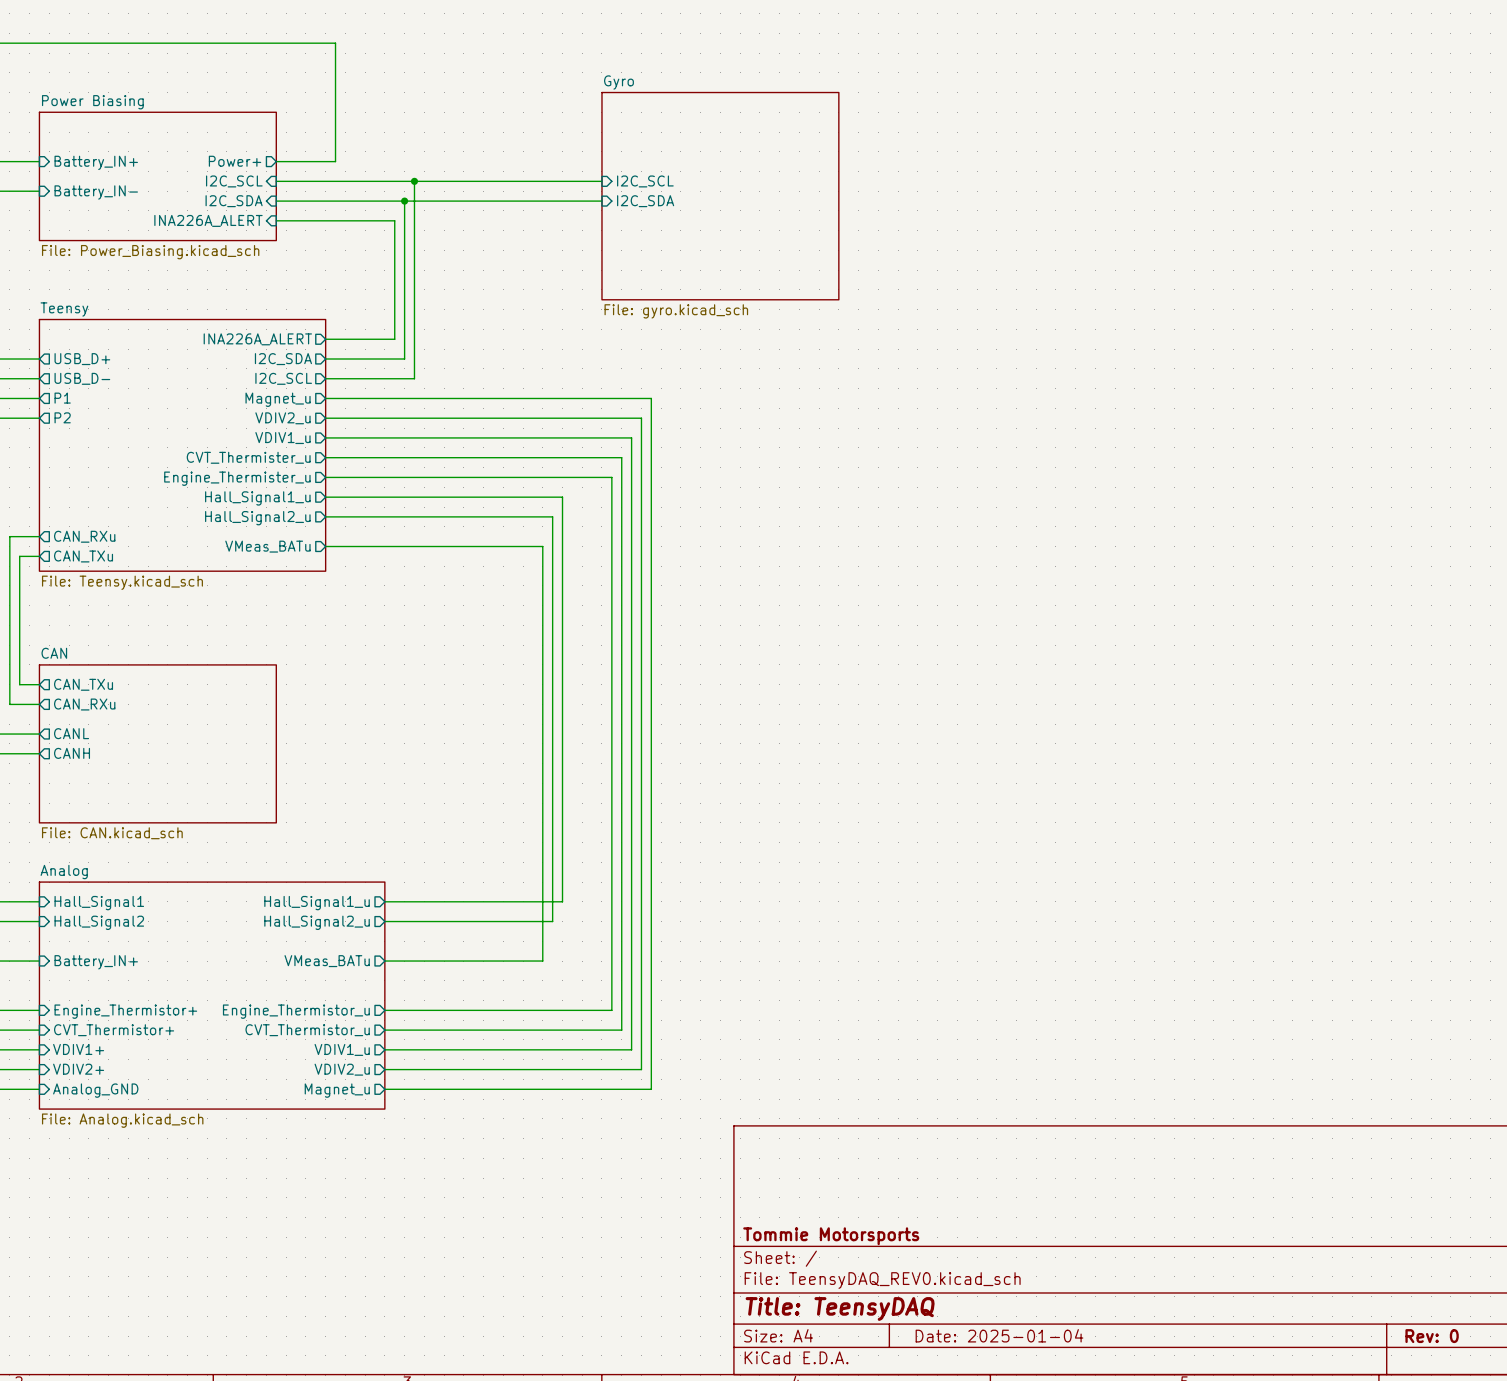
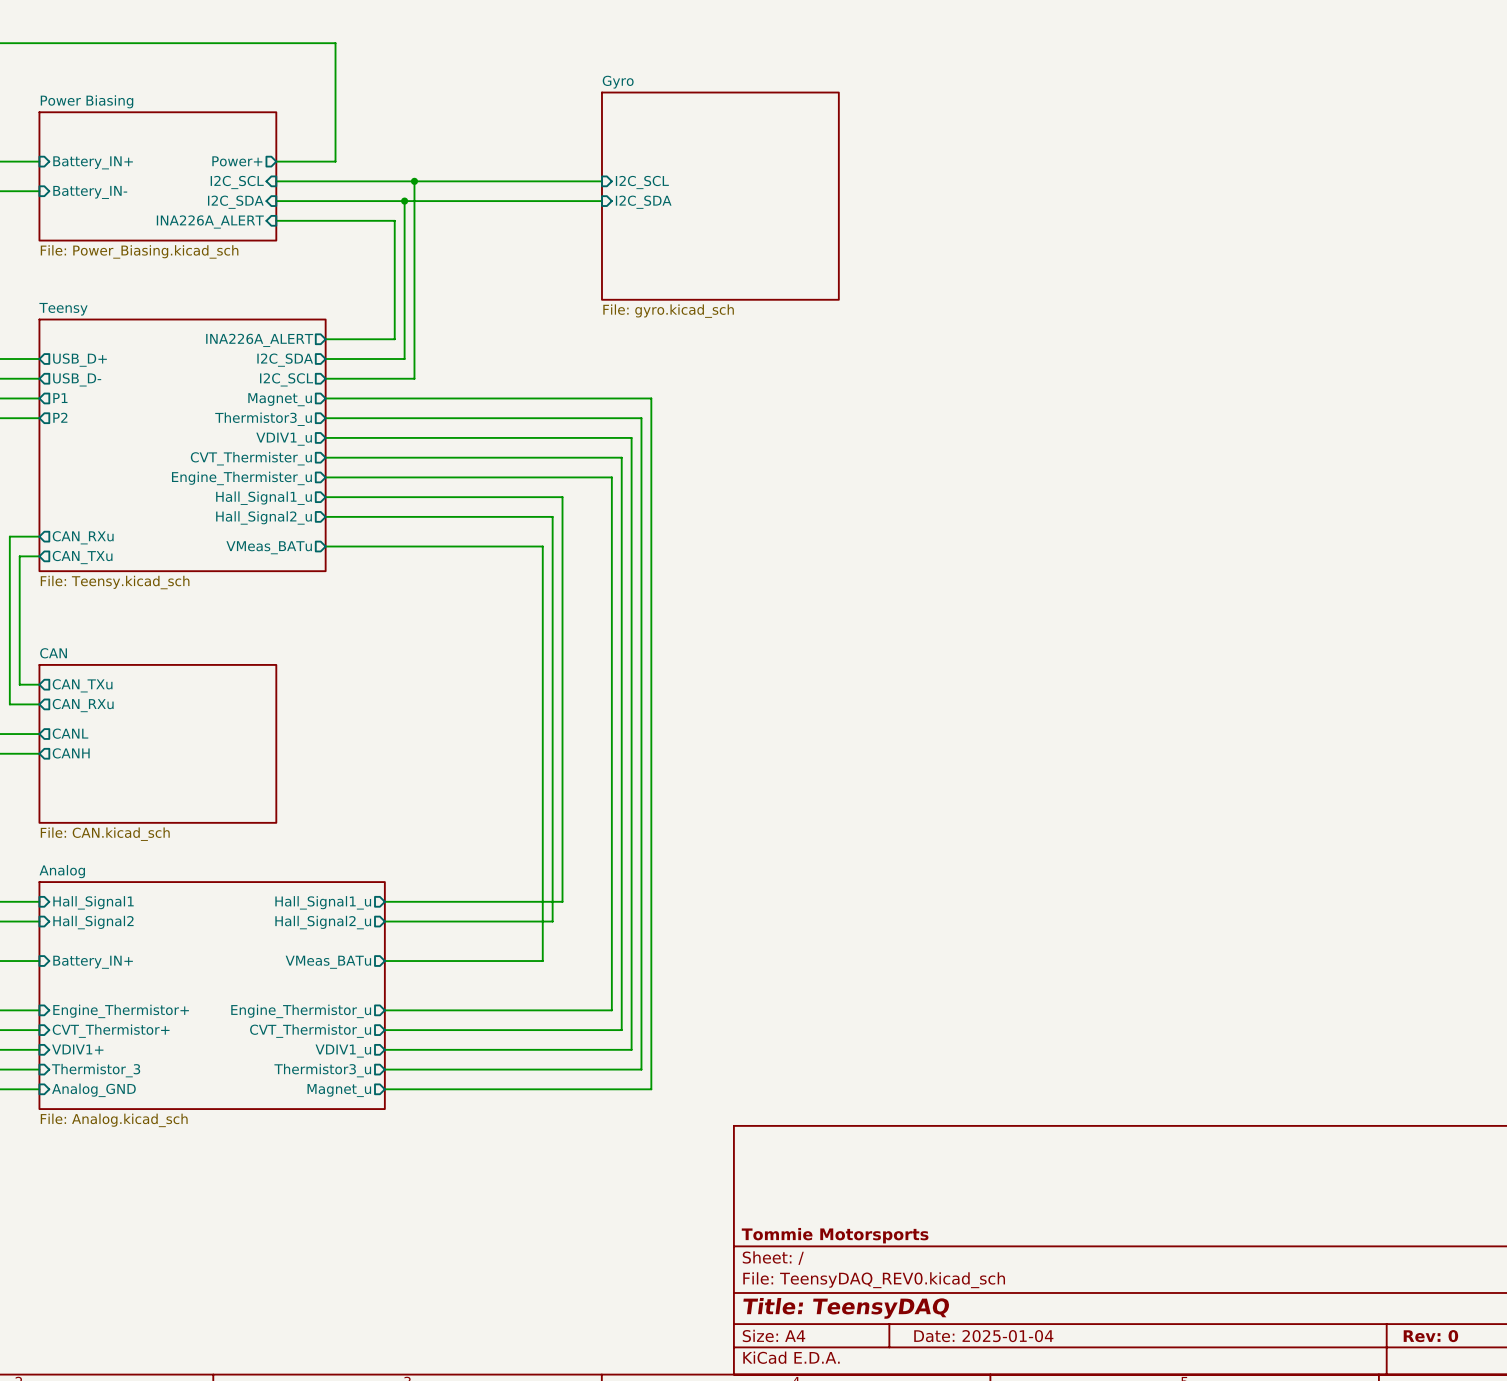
sheet pin: VDIV2_u (282, 418) -> Thermistor3_u (263, 419)
sheet pin: VDIV2+ (78, 1069) -> Thermistor_3 (96, 1070)
sheet pin: VDIV2_u (342, 1069) -> Thermistor3_u (322, 1070)

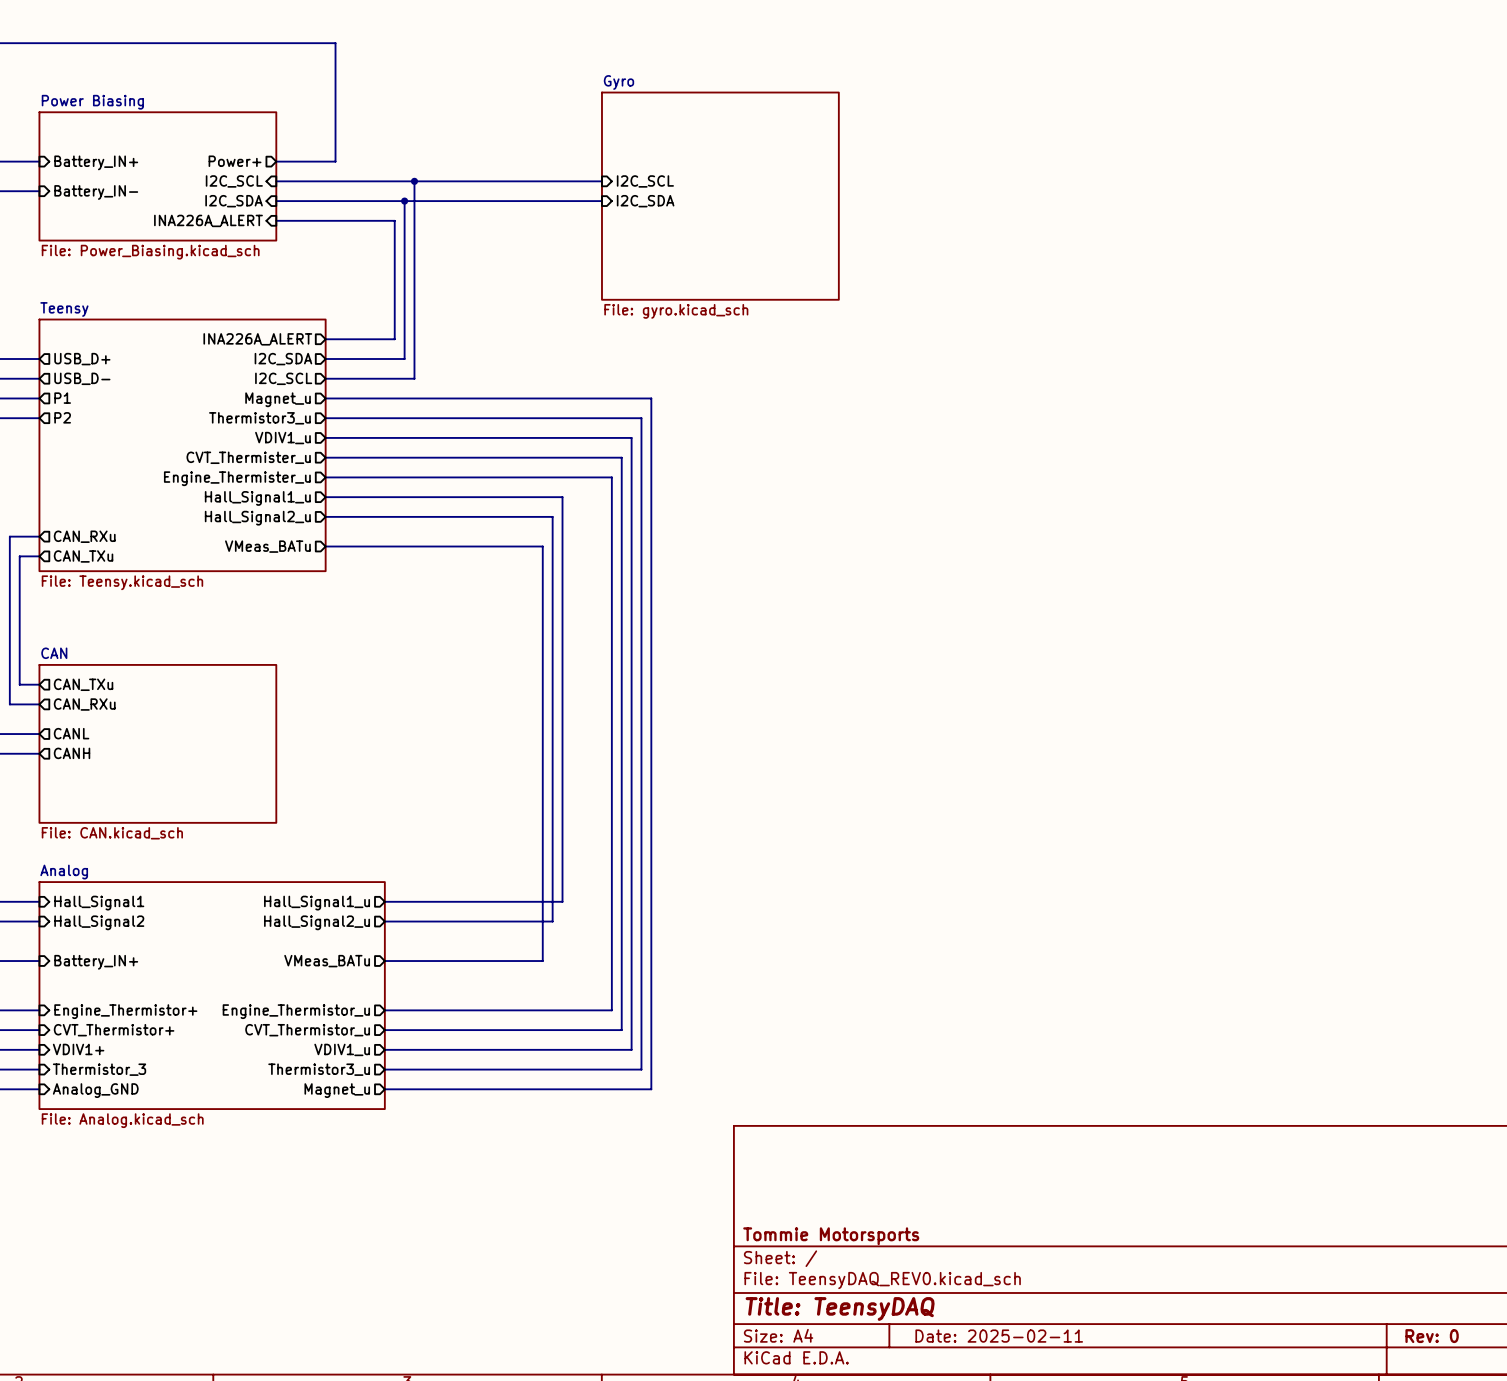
title block: Date: 2025-01-04 (983, 1336) -> Date: 2025-02-11 (999, 1336)

